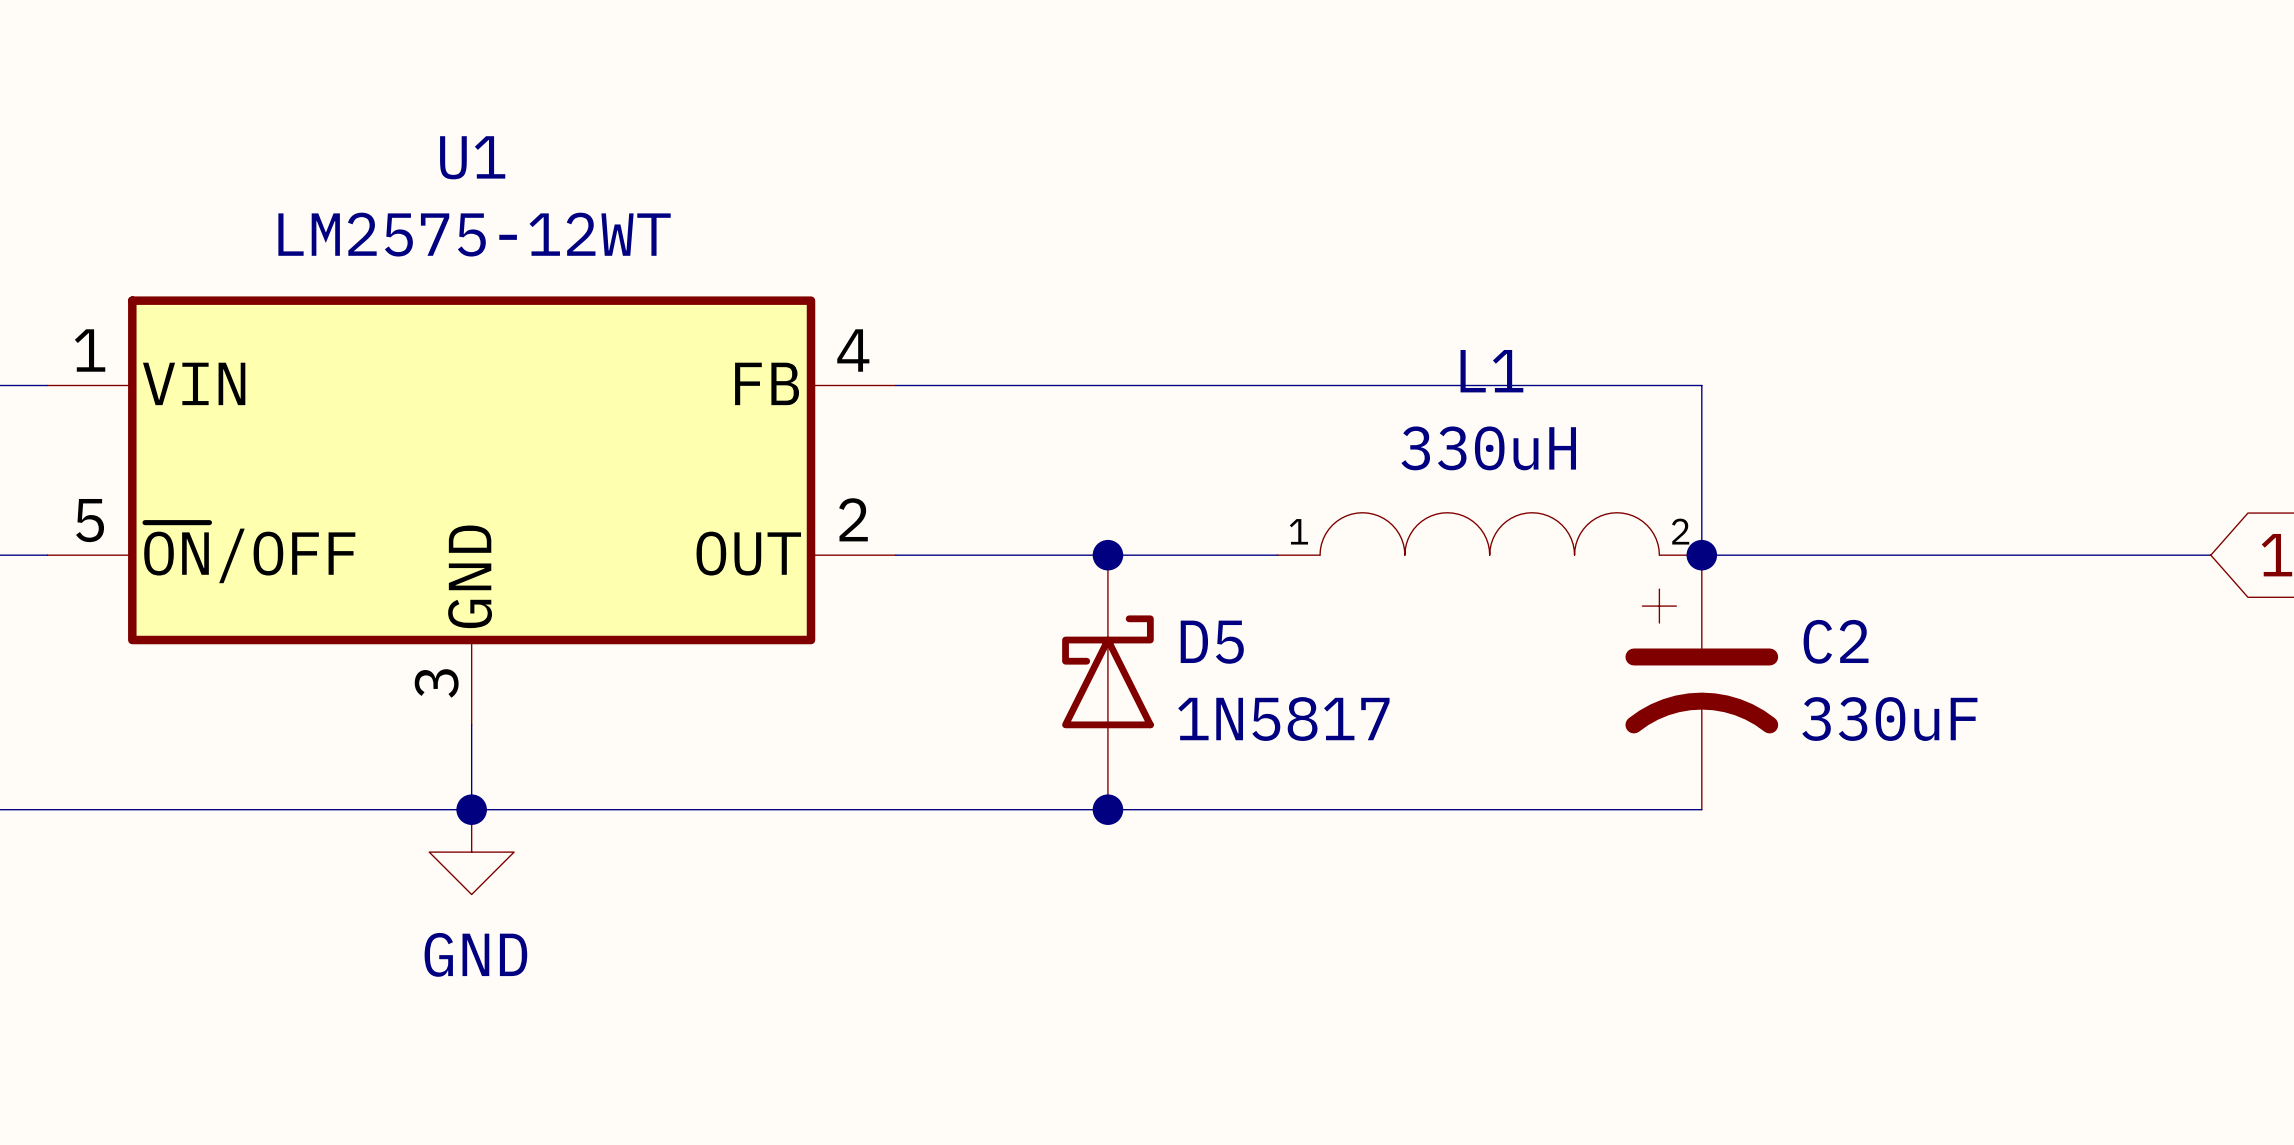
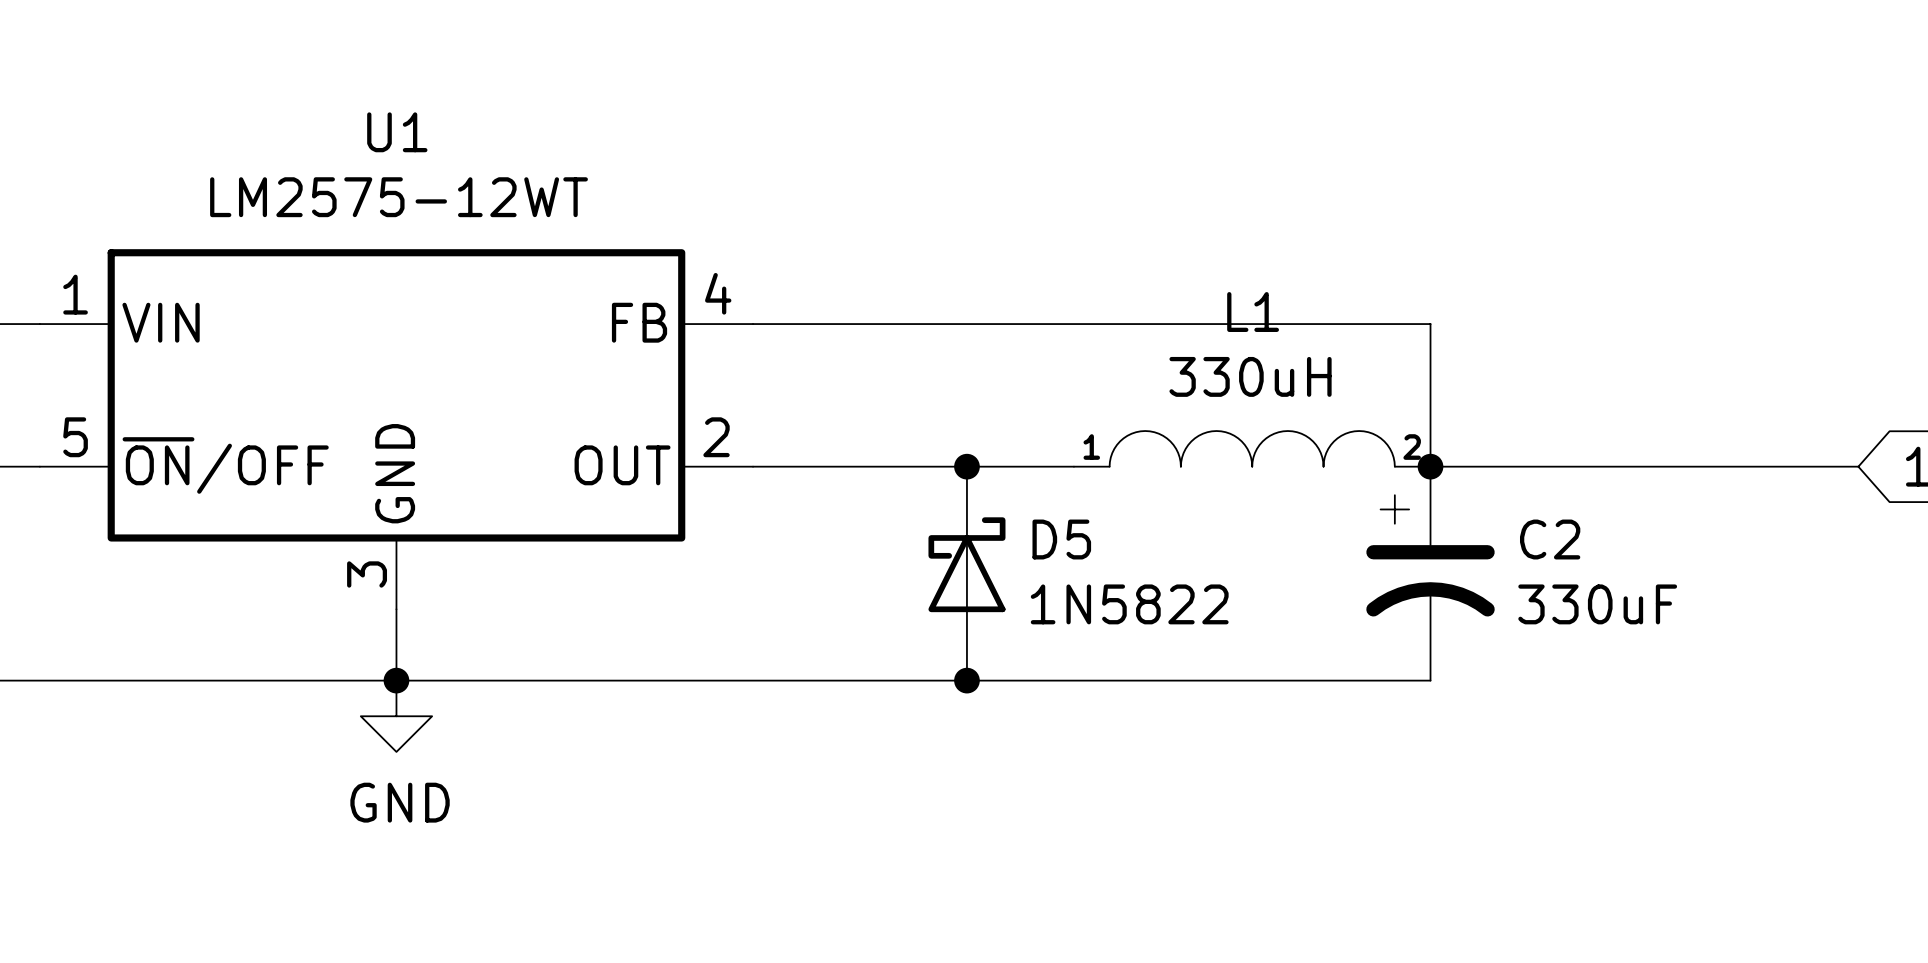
junction position: (1107, 555) -> (966, 466)
D5 position: (1107, 682) -> (966, 573)
D5 value: 1N5817 (1283, 719) -> 1N5822 (1129, 604)
junction position: (1107, 809) -> (966, 680)

